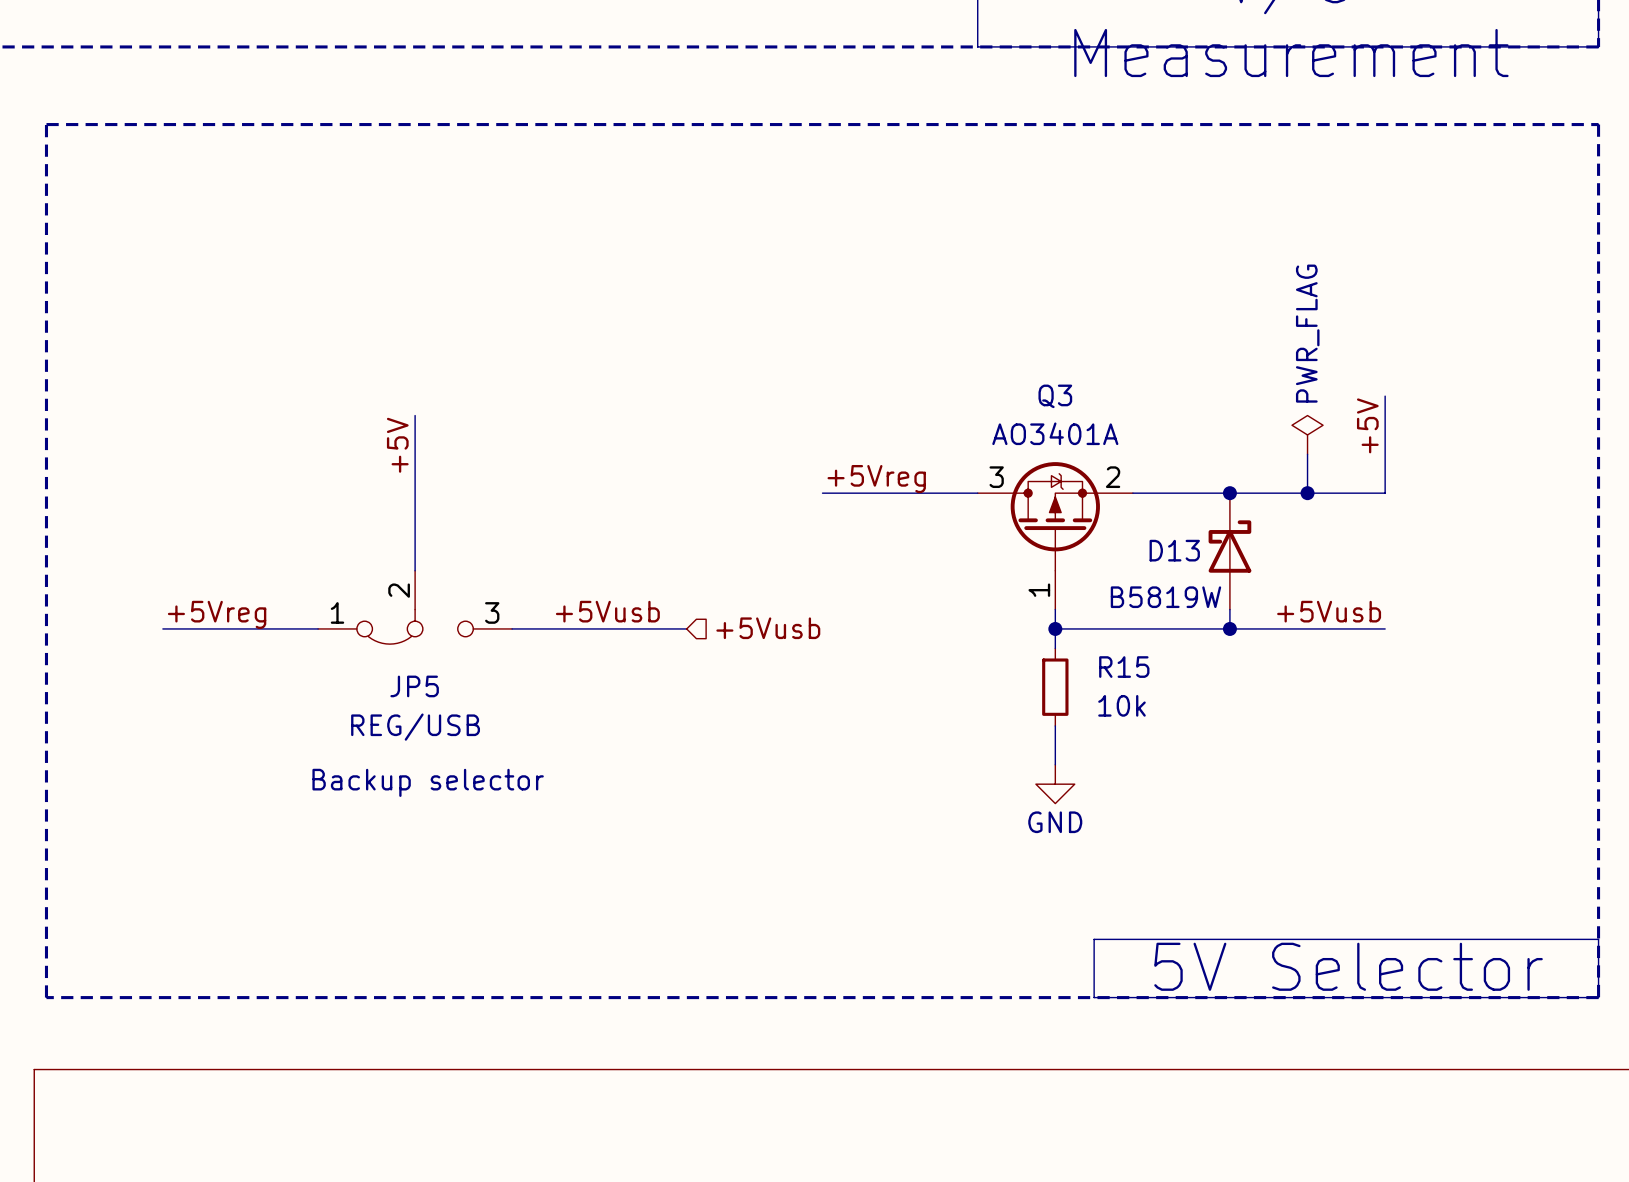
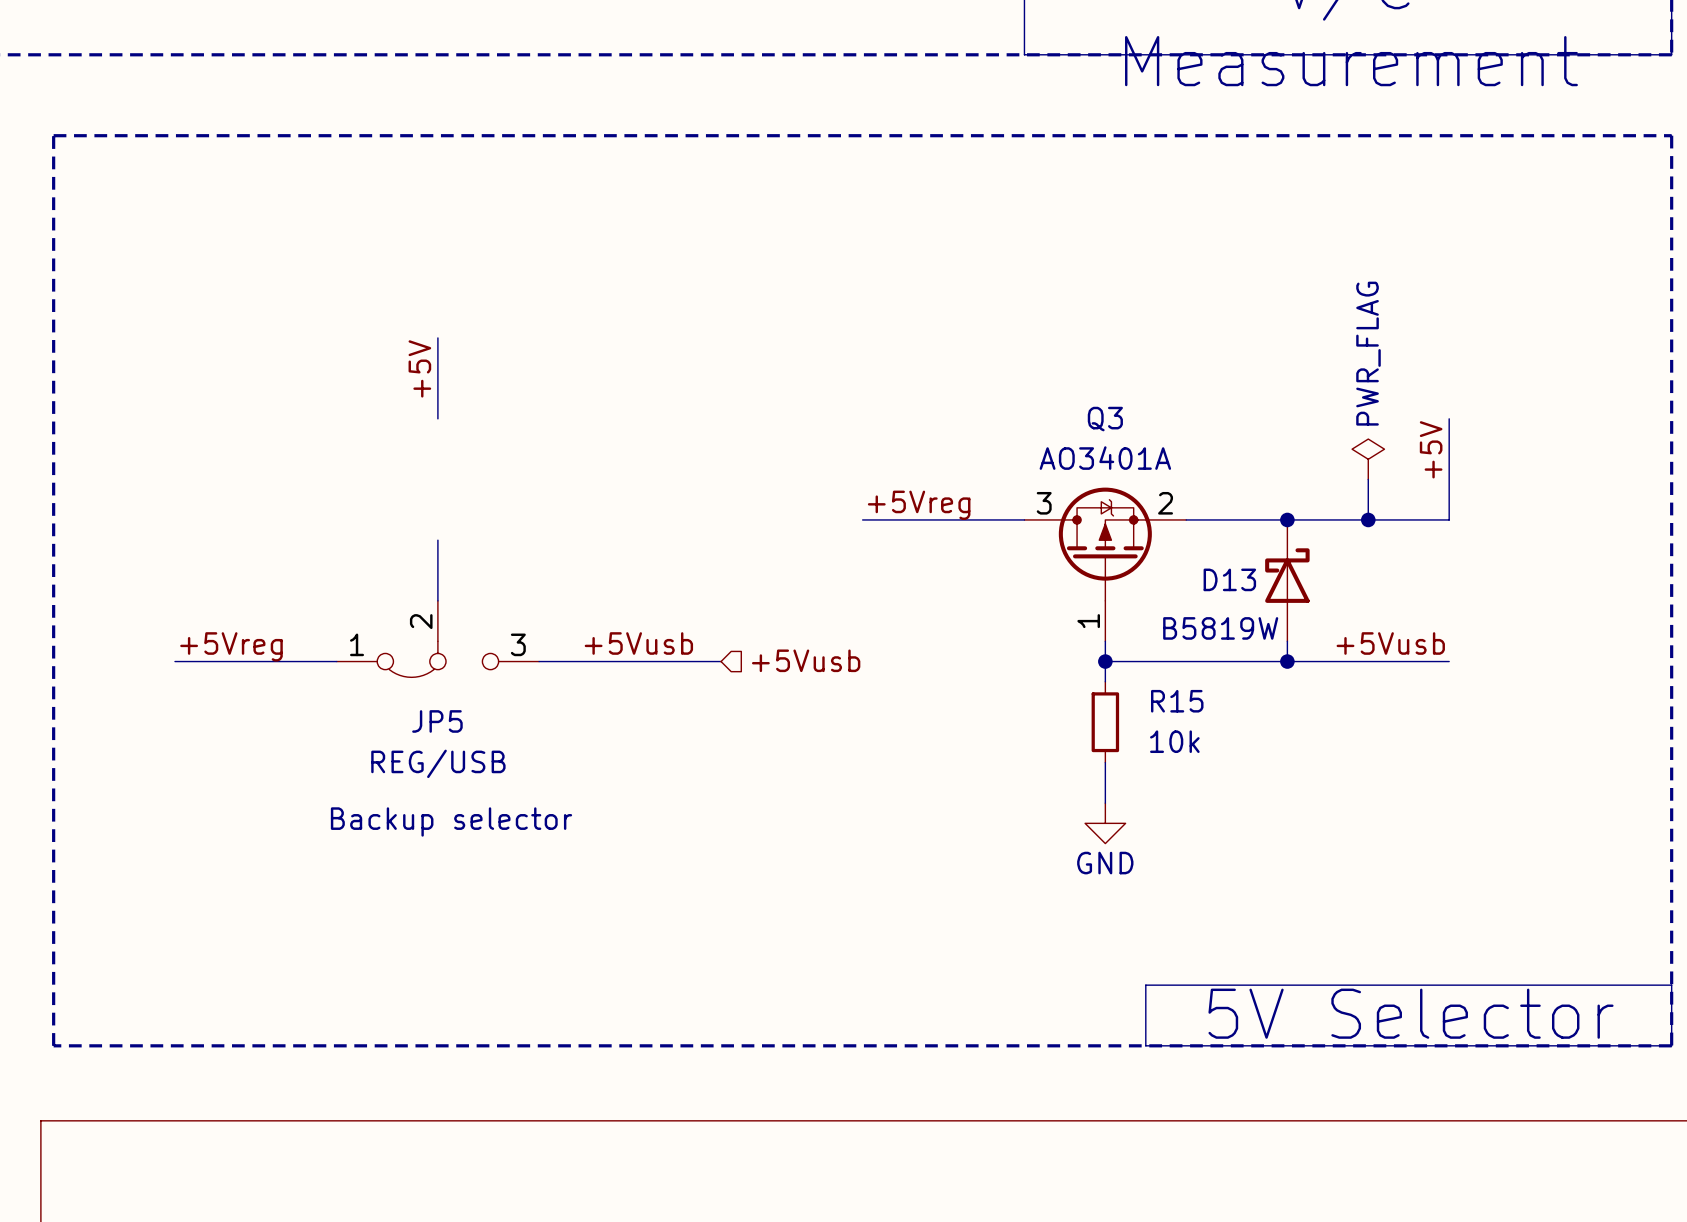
wire: none -> (437, 337) (437, 418)
wire: (415, 415) (415, 512) -> none
label position: +5V (397, 445) -> +5V (419, 368)

